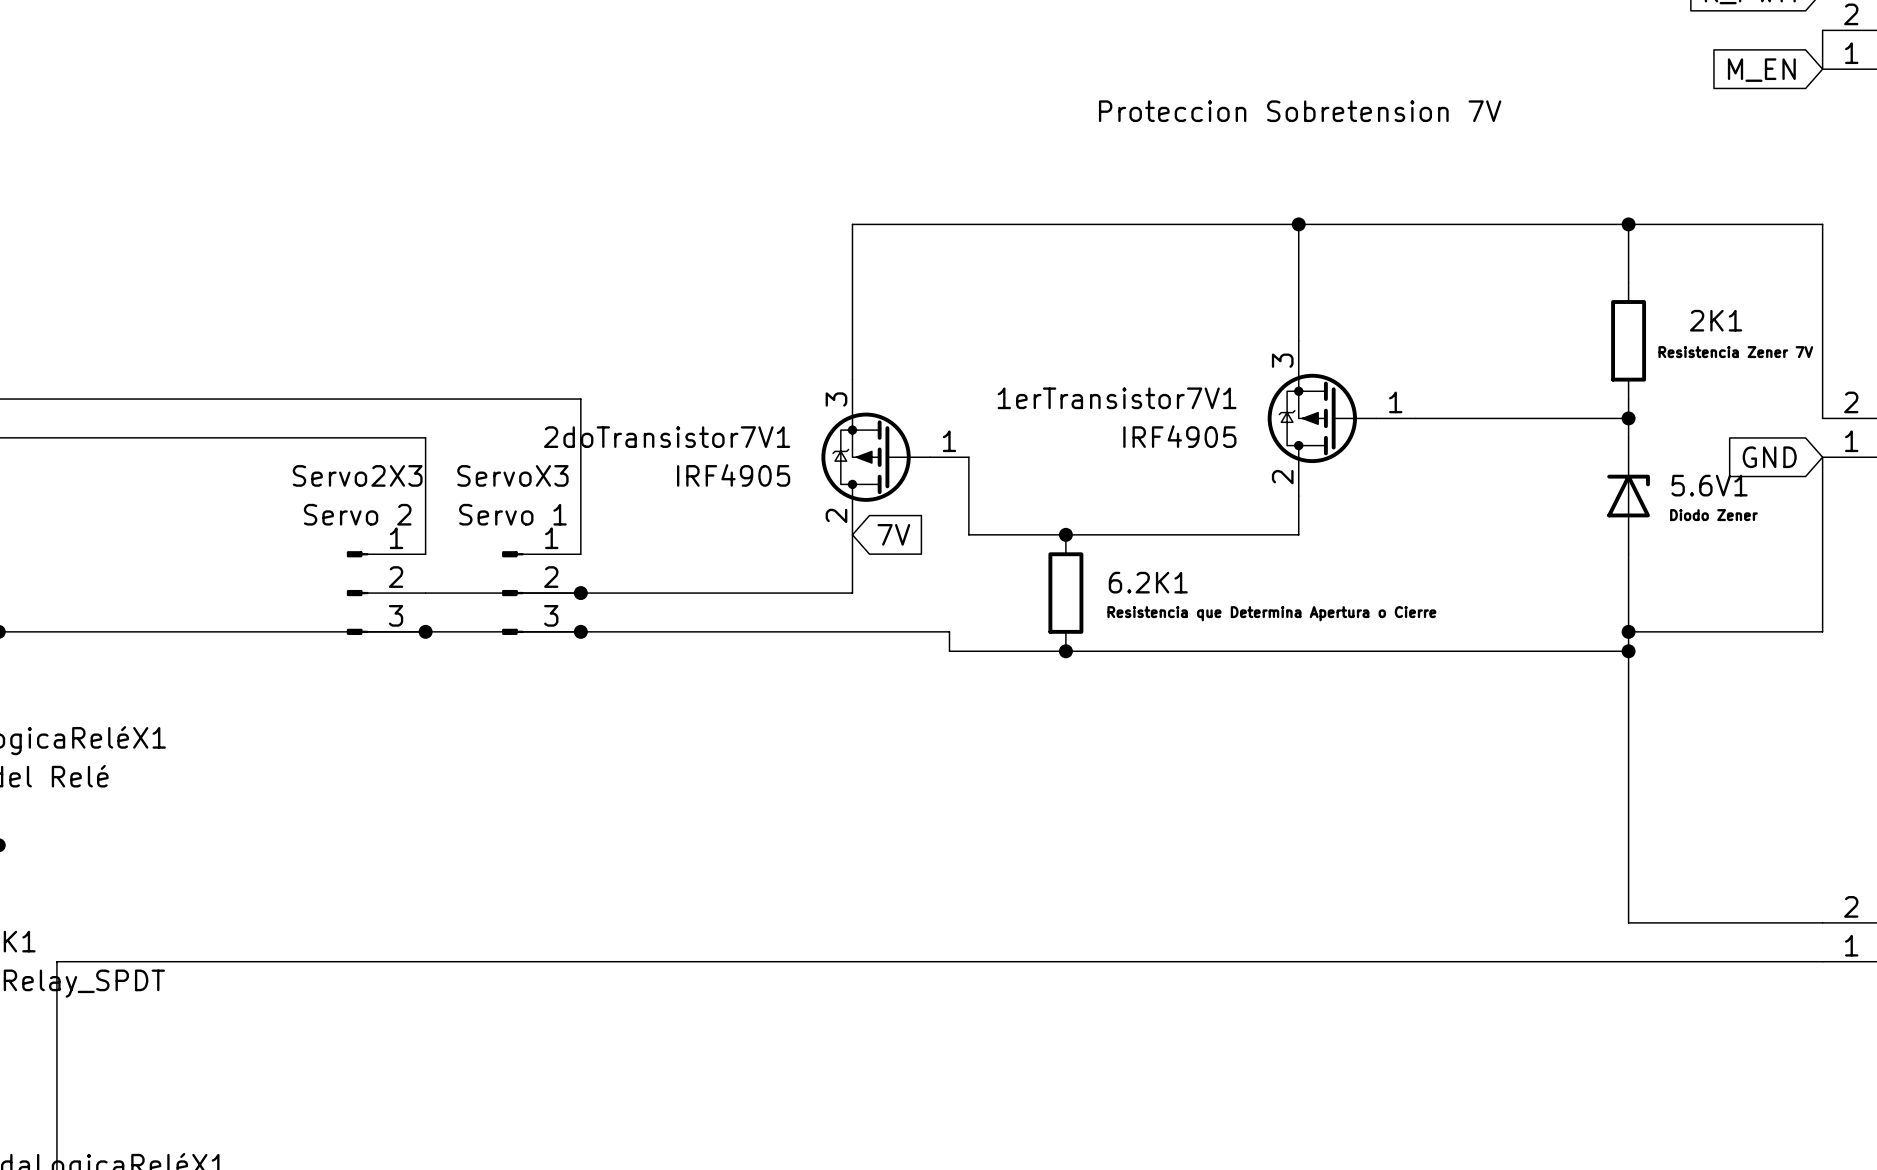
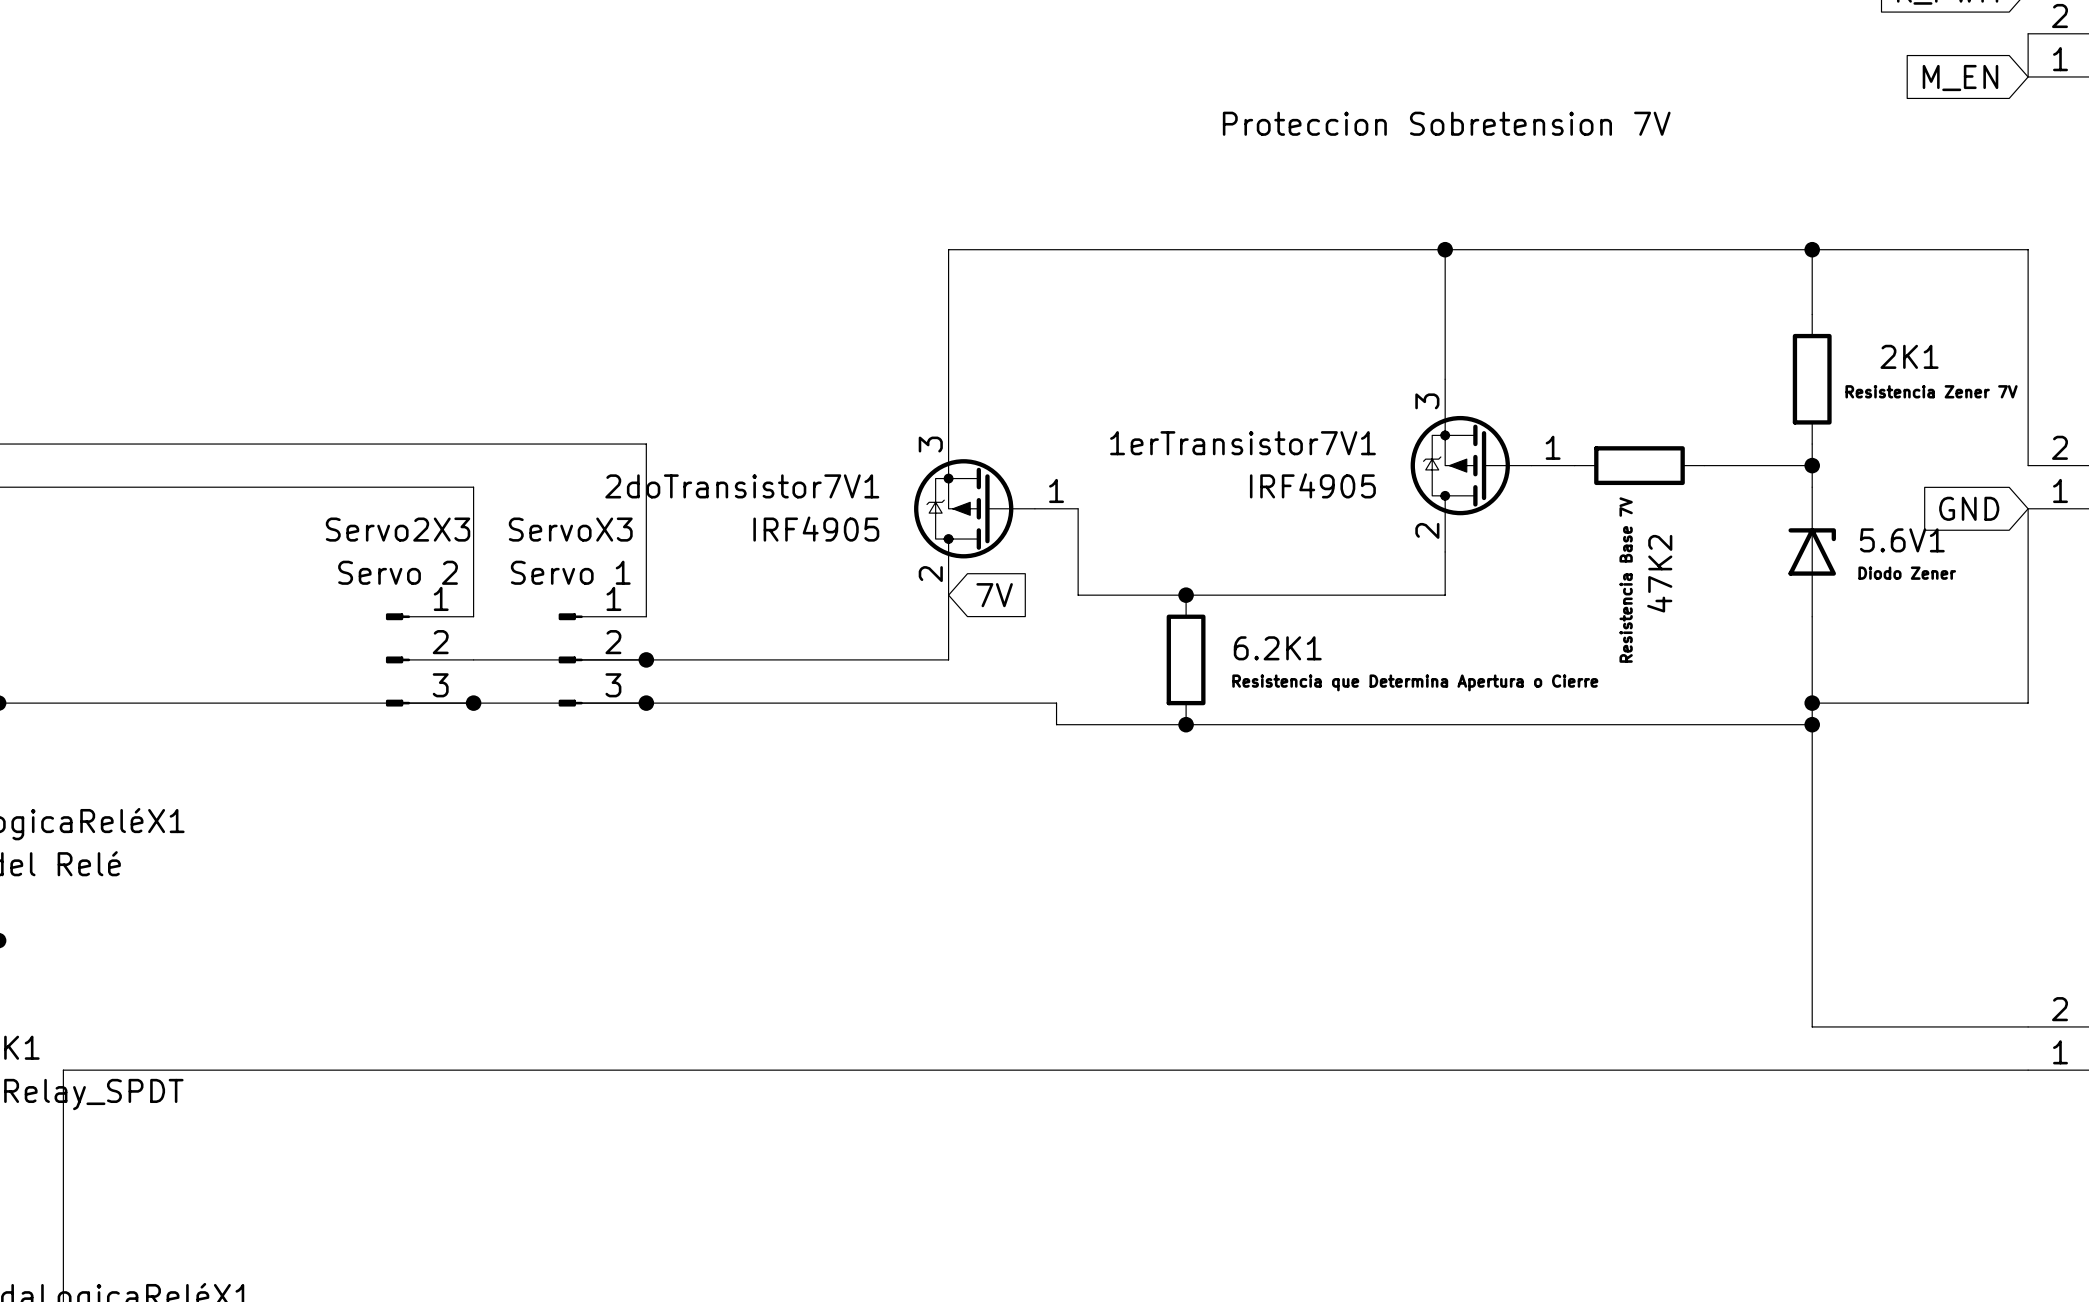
wire: (1415, 418) (1531, 418) -> none
47K2: none -> Resistencia Base 7V (1639, 465)

